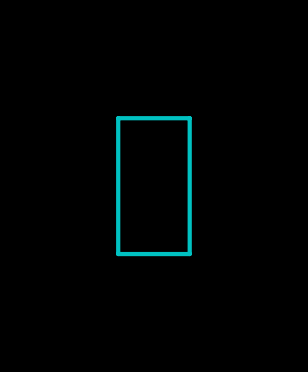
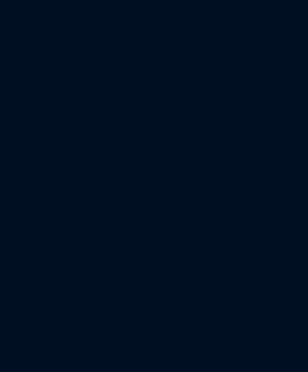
line: (118, 118) (118, 254) (189, 254) (189, 118) (118, 118) -> none

